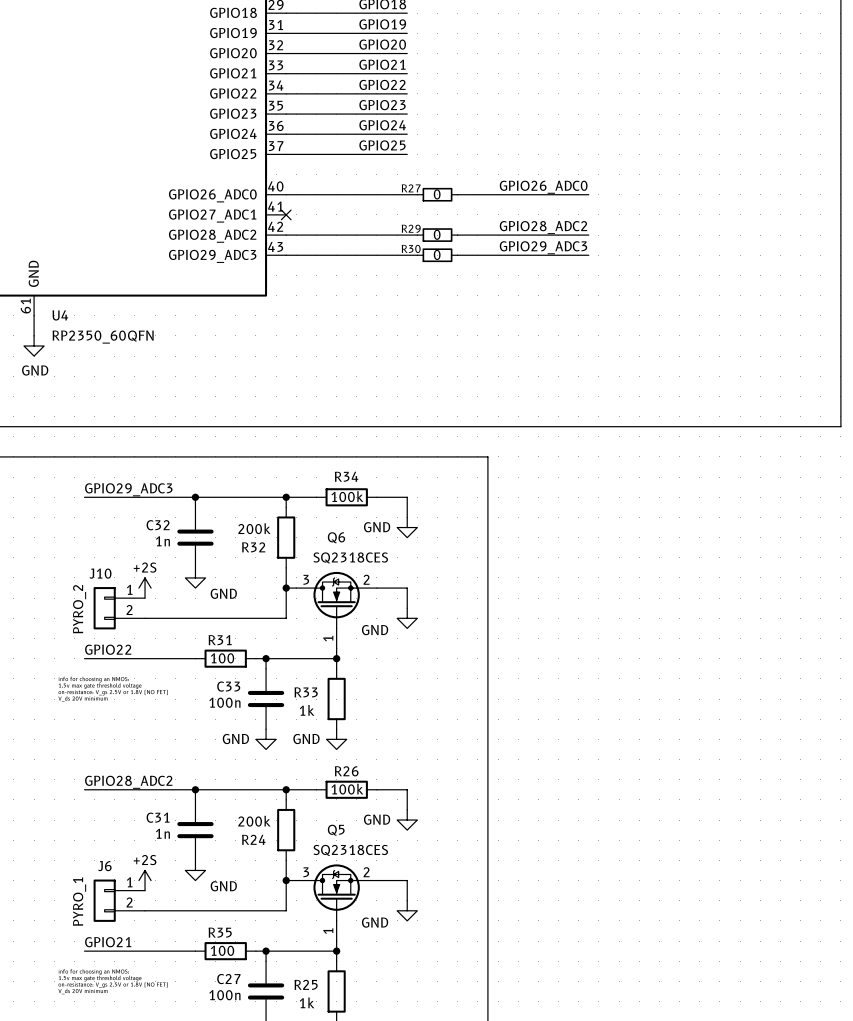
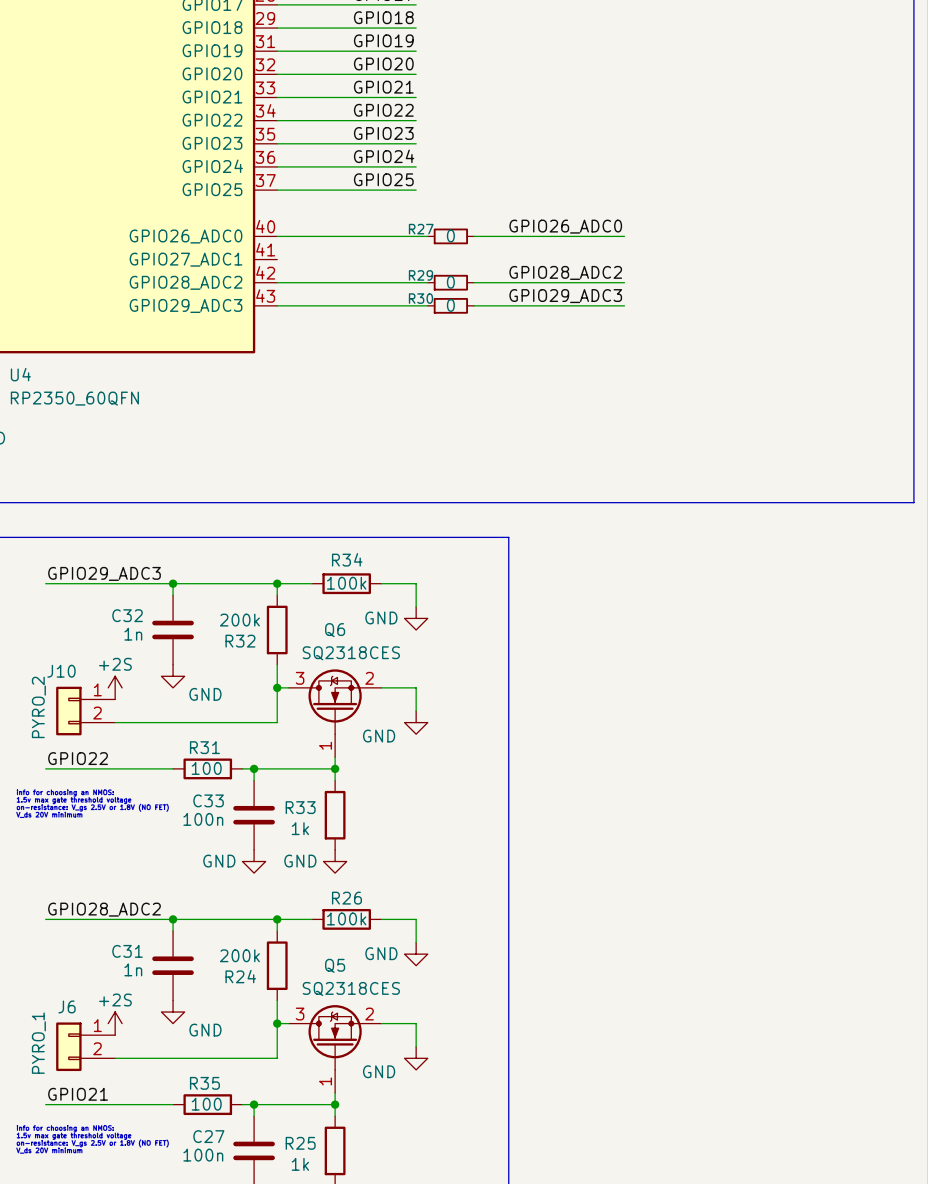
no-connect mark: (286, 214) -> none

